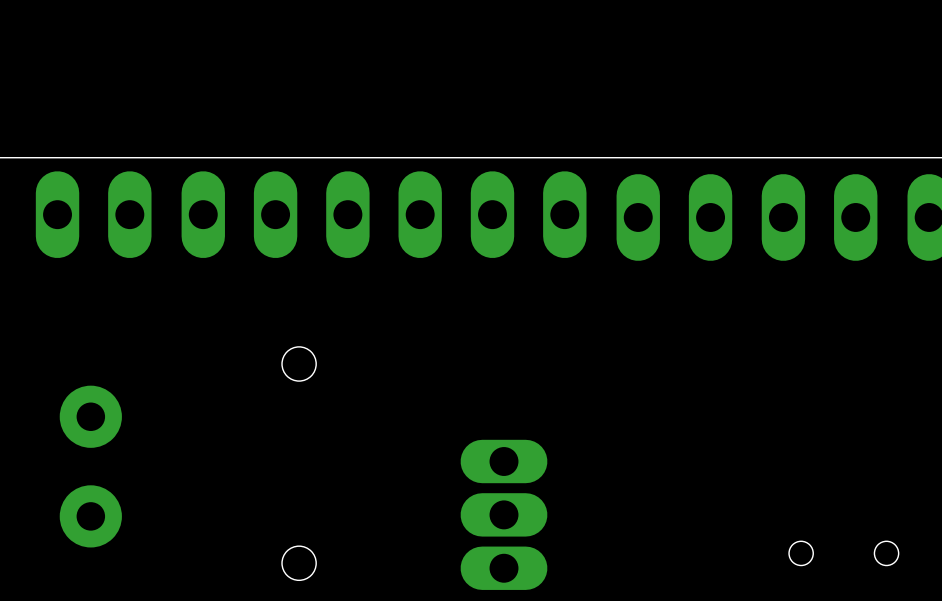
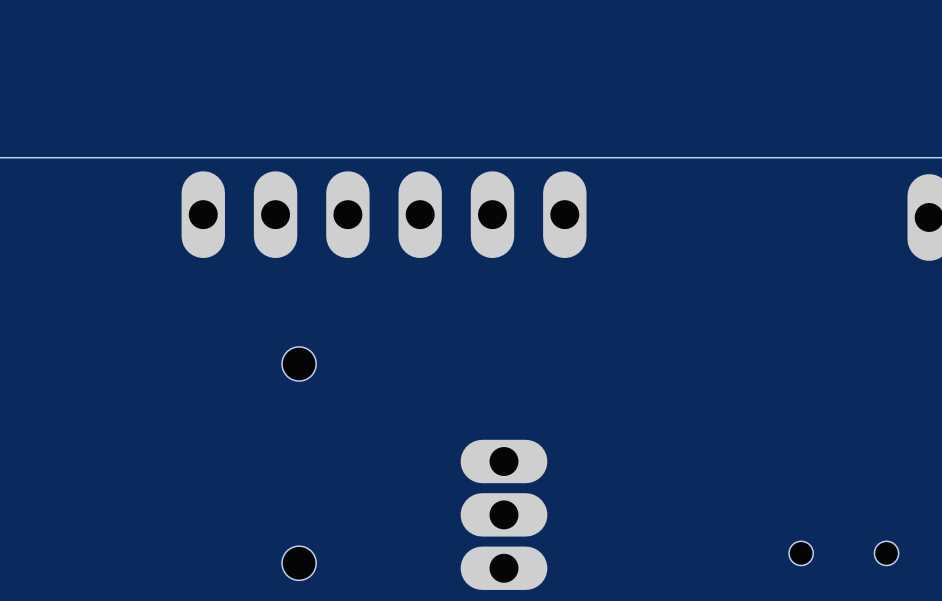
part: (93, 214) -> none
part: (674, 217) -> none
part: (819, 217) -> none
part: (90, 466) -> none

